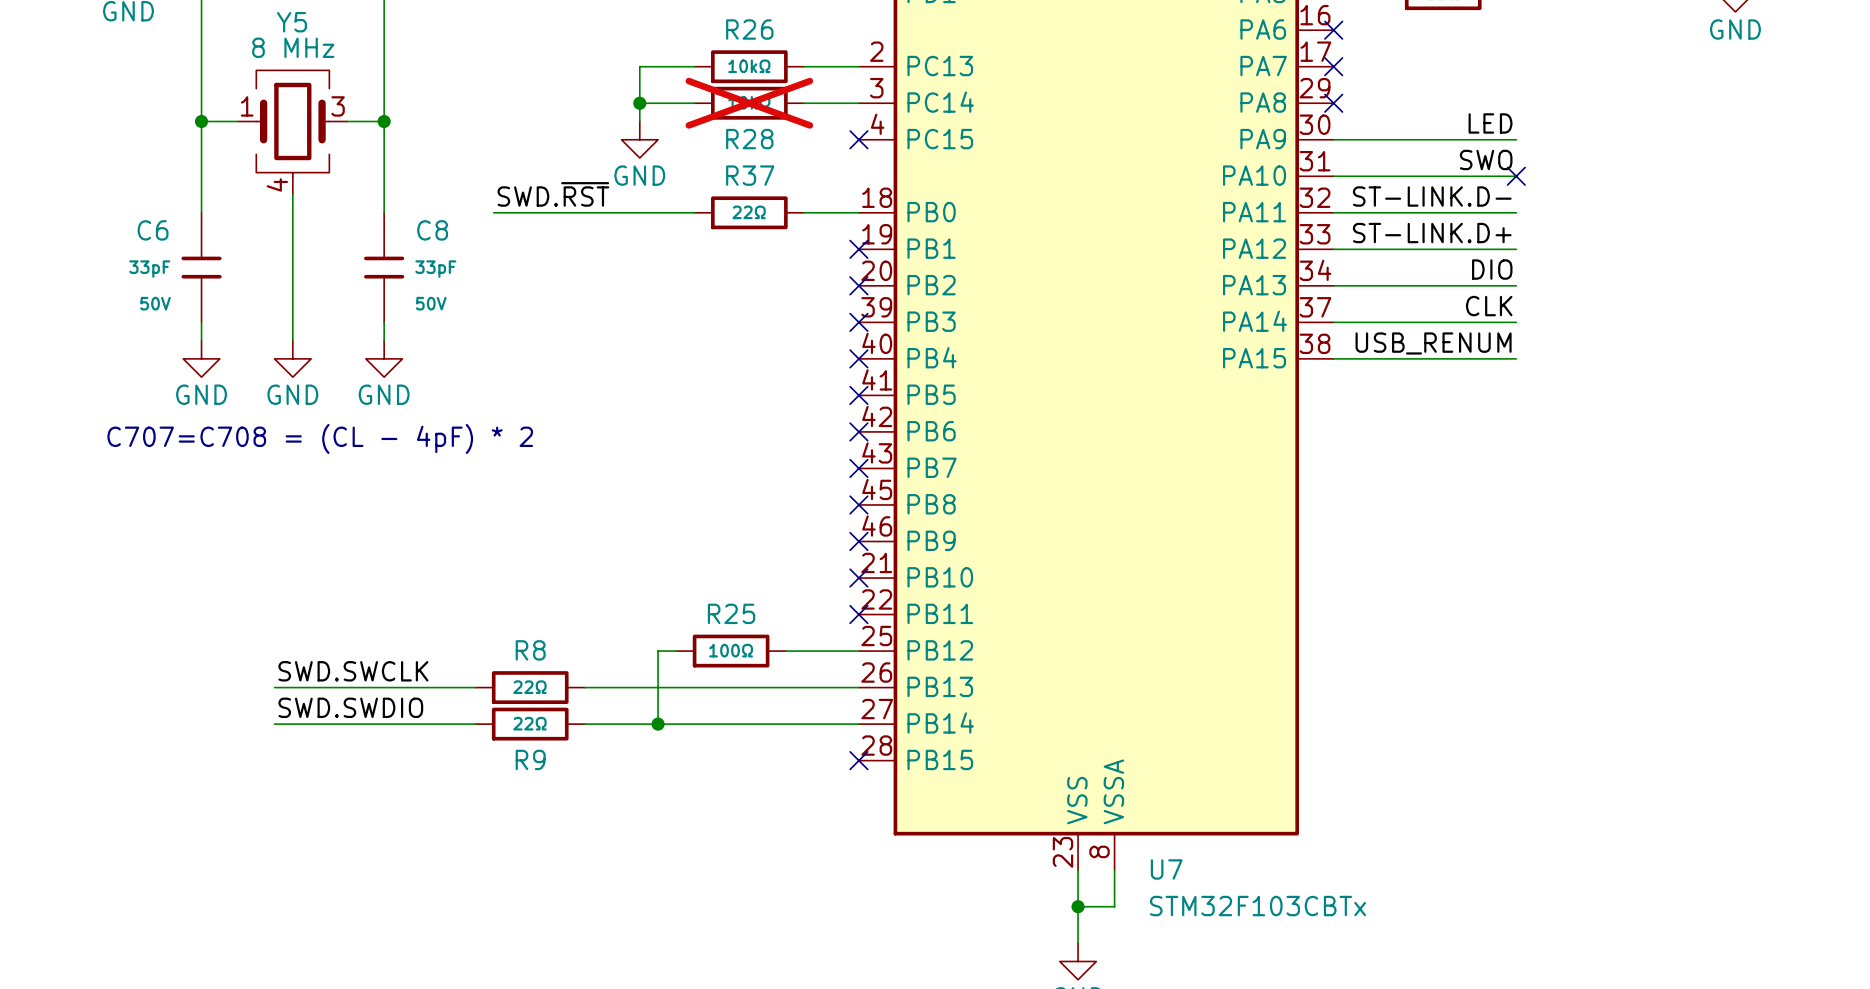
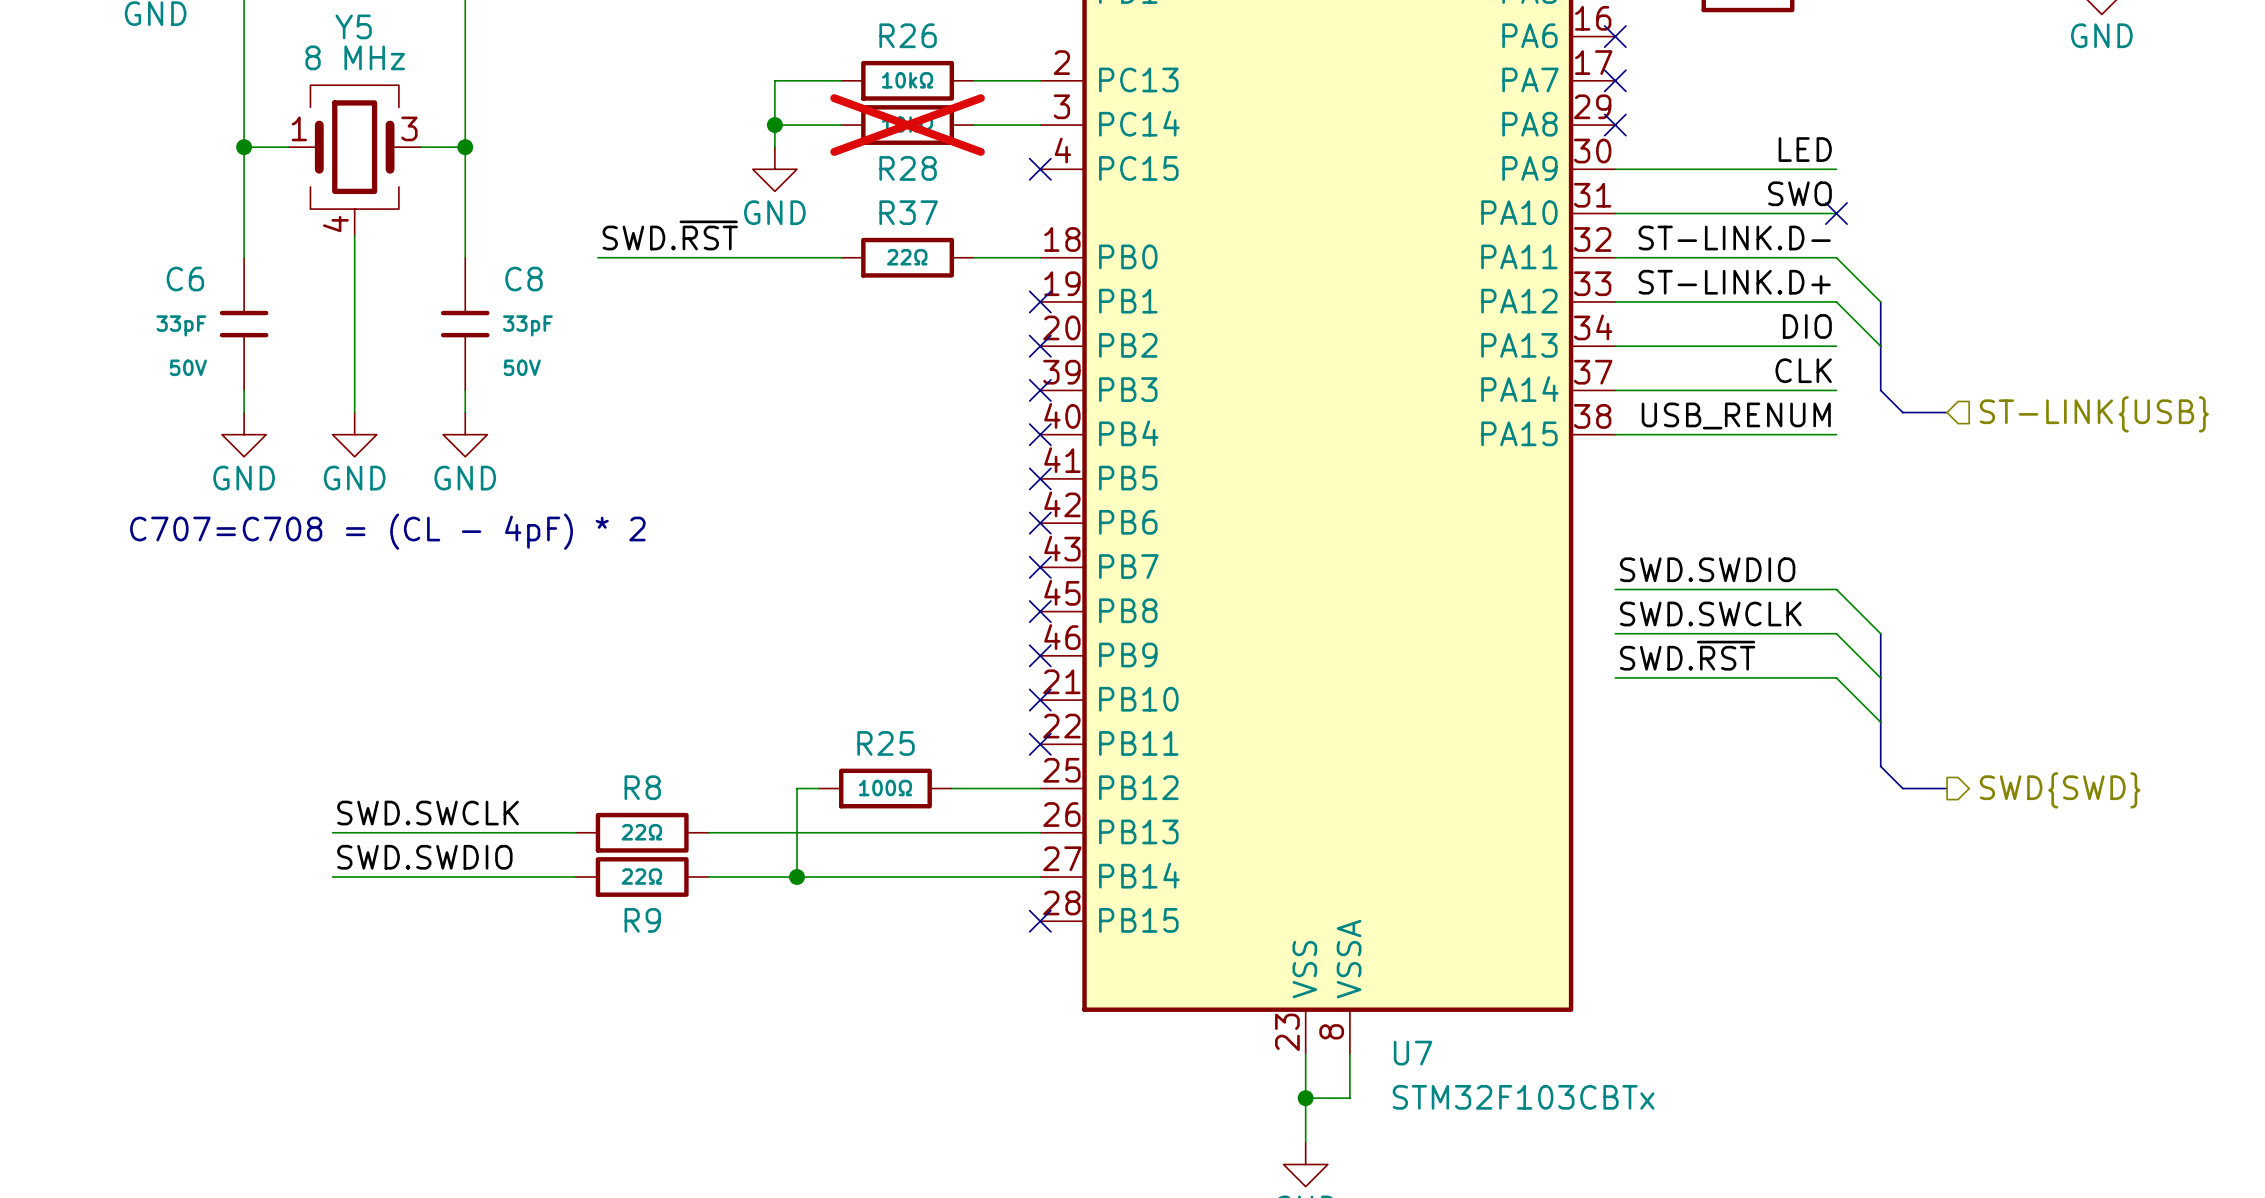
wire: none -> (1836, 257) (1880, 301)
wire: none -> (1836, 301) (1880, 346)
bus: none -> (1880, 301) (1880, 390) (1902, 412) (1947, 412)
hierarchical label: none -> ST-LINK{USB} (2094, 414)
label: none -> SWD.SWDIO (1707, 569)
wire: none -> (1615, 589) (1836, 589) (1880, 633)
label: none -> SWD.SWCLK (1710, 613)
wire: none -> (1615, 633) (1836, 633) (1880, 677)
bus: none -> (1880, 633) (1880, 766) (1902, 788) (1947, 788)
label: none -> SWD.~{RST} (1687, 655)
wire: none -> (1615, 677) (1836, 677) (1880, 722)
hierarchical label: none -> SWD{SWD} (2060, 790)

